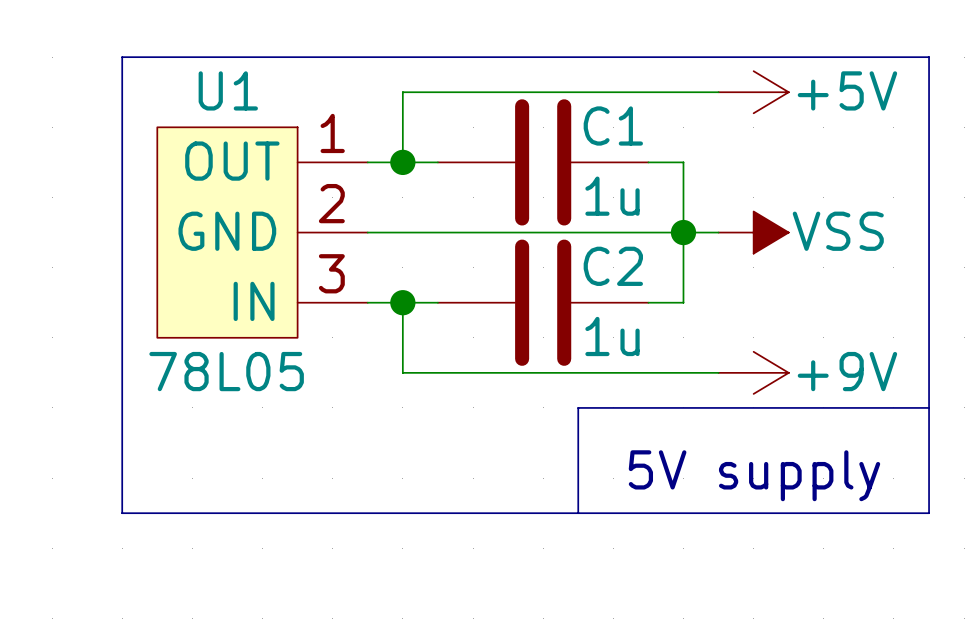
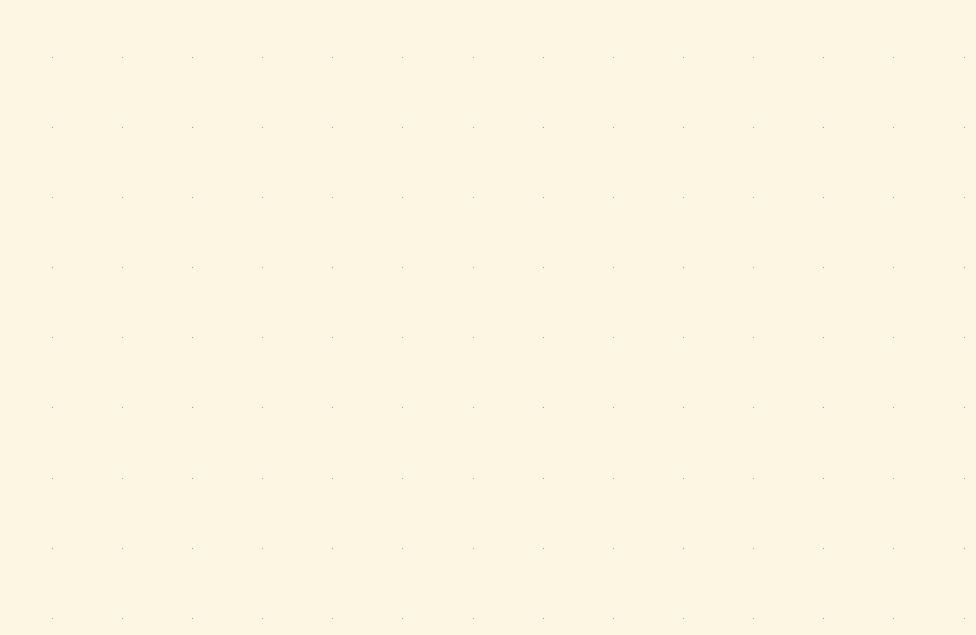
line: (122, 57) (122, 513) (929, 513) (929, 57) (122, 57) -> none
wire: (718, 92) (402, 92) (402, 162) -> none
power symbol: +5V (753, 92) -> none
wire: (367, 162) (437, 162) -> none
junction: (402, 162) -> none
C1: 1u (543, 162) -> none
wire: (648, 162) (683, 162) (683, 302) (648, 302) -> none
U1: 78L05 (262, 232) -> none
wire: (367, 232) (718, 232) -> none
junction: (683, 232) -> none
power symbol: VSS (753, 232) -> none
wire: (367, 302) (437, 302) -> none
wire: (402, 302) (402, 372) (718, 372) -> none
junction: (402, 302) -> none
C2: 1u (543, 302) -> none
power symbol: +9V (753, 372) -> none
line: (929, 407) (578, 407) (578, 513) -> none
text: 5V supply (754, 475) -> none

